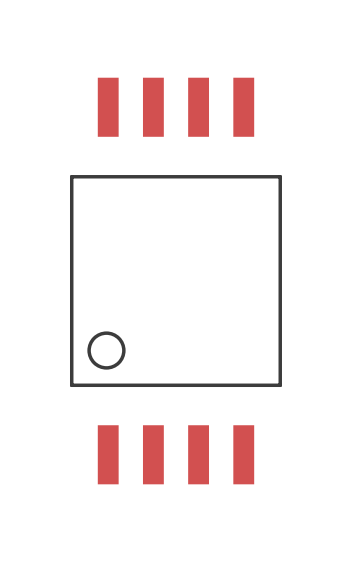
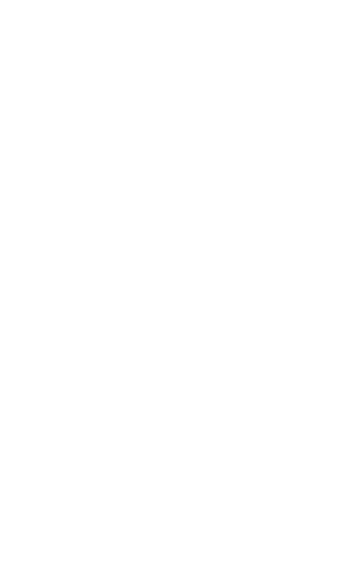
part: (175, 281) -> none

